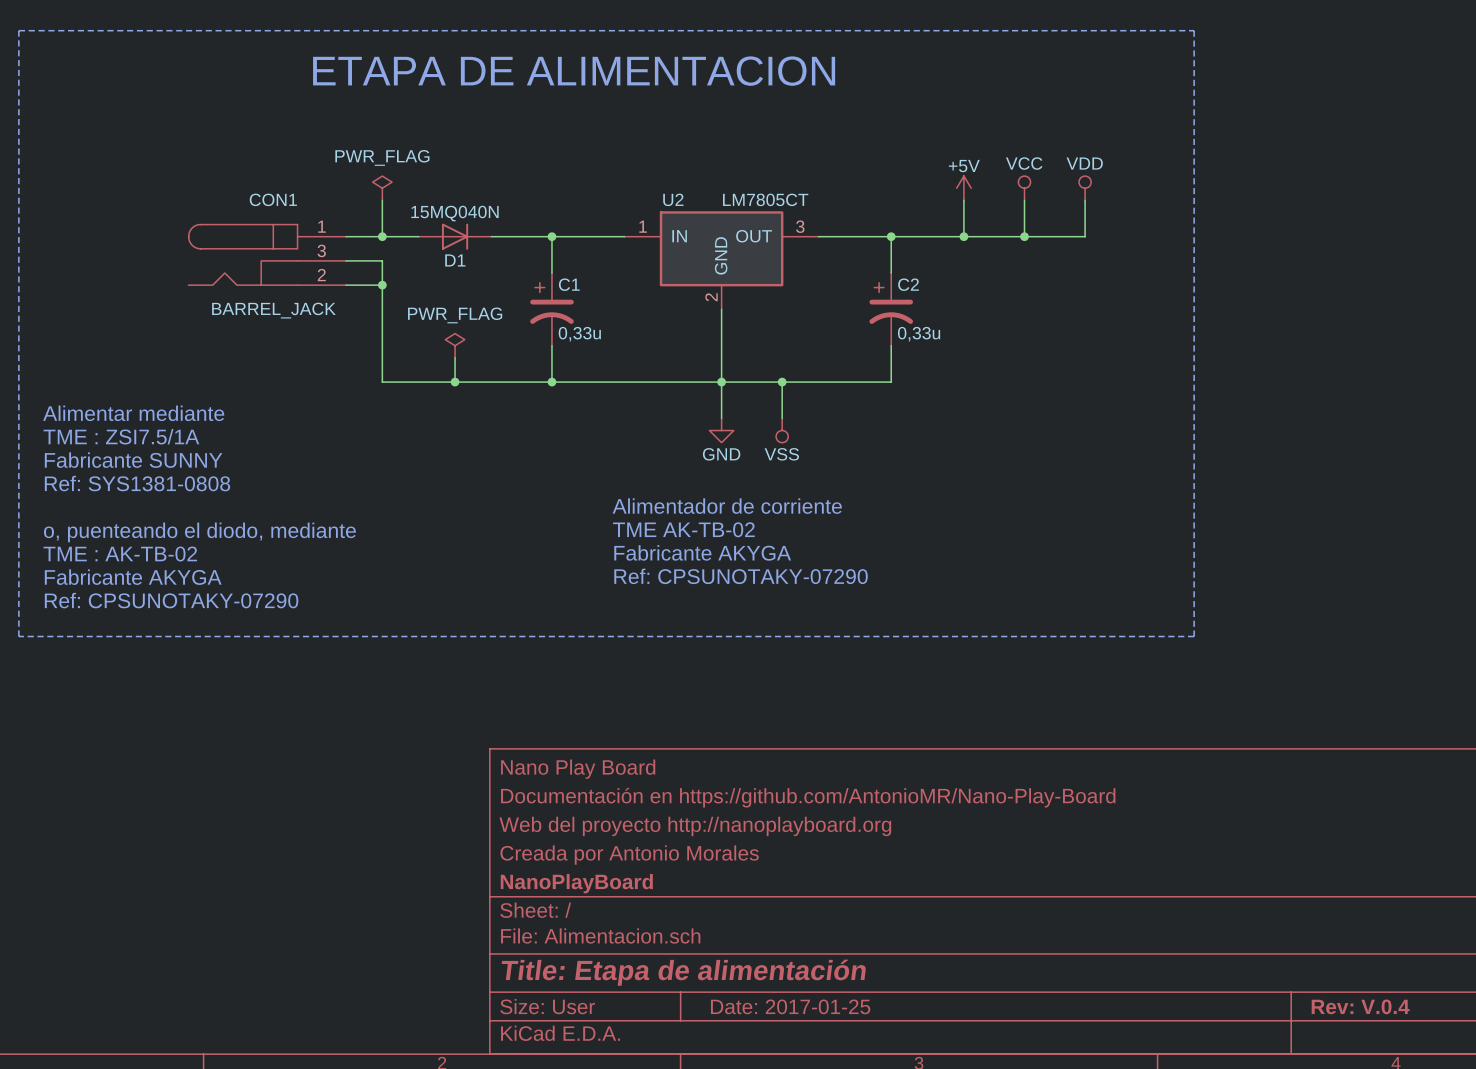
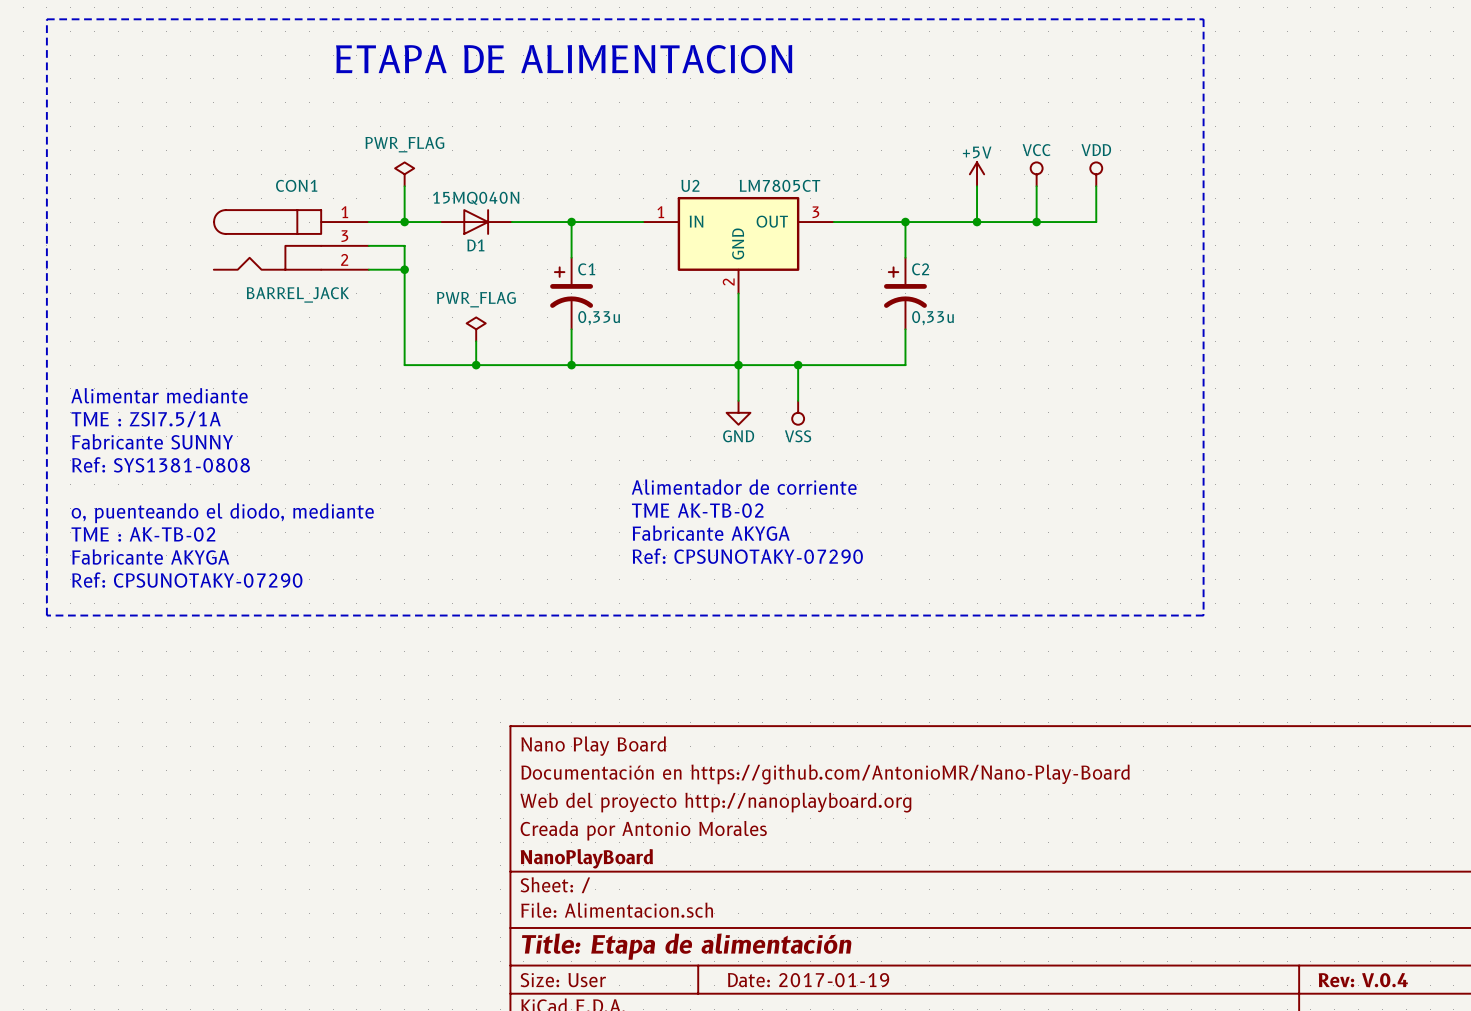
title block: Date: 2017-01-25 (790, 1006) -> Date: 2017-01-19 (808, 980)

